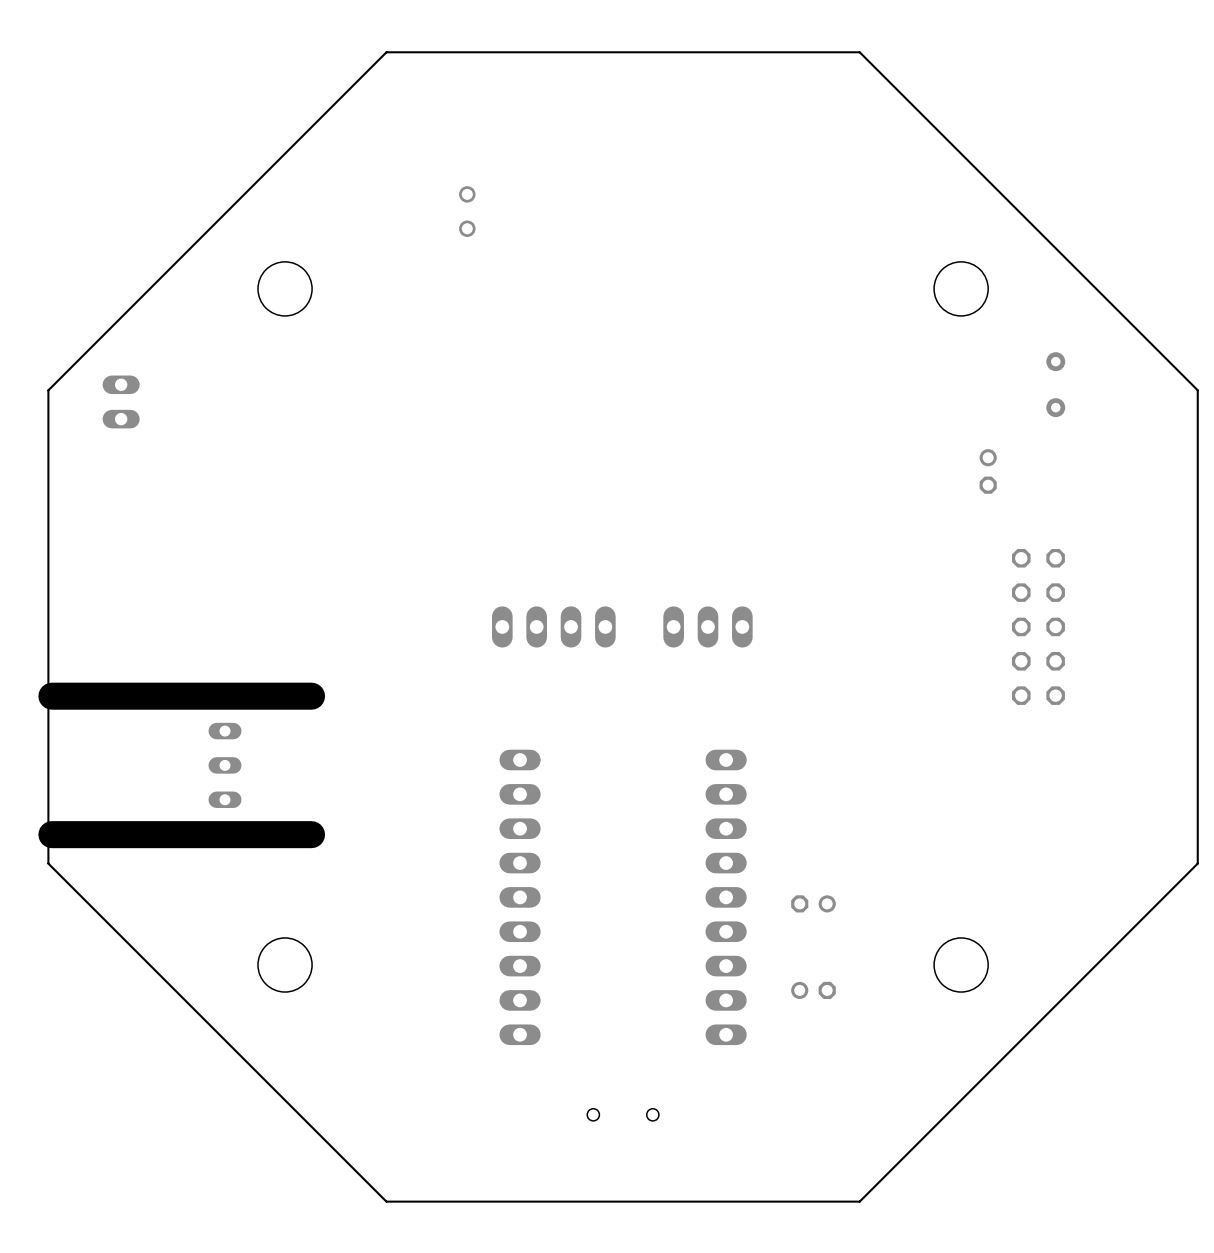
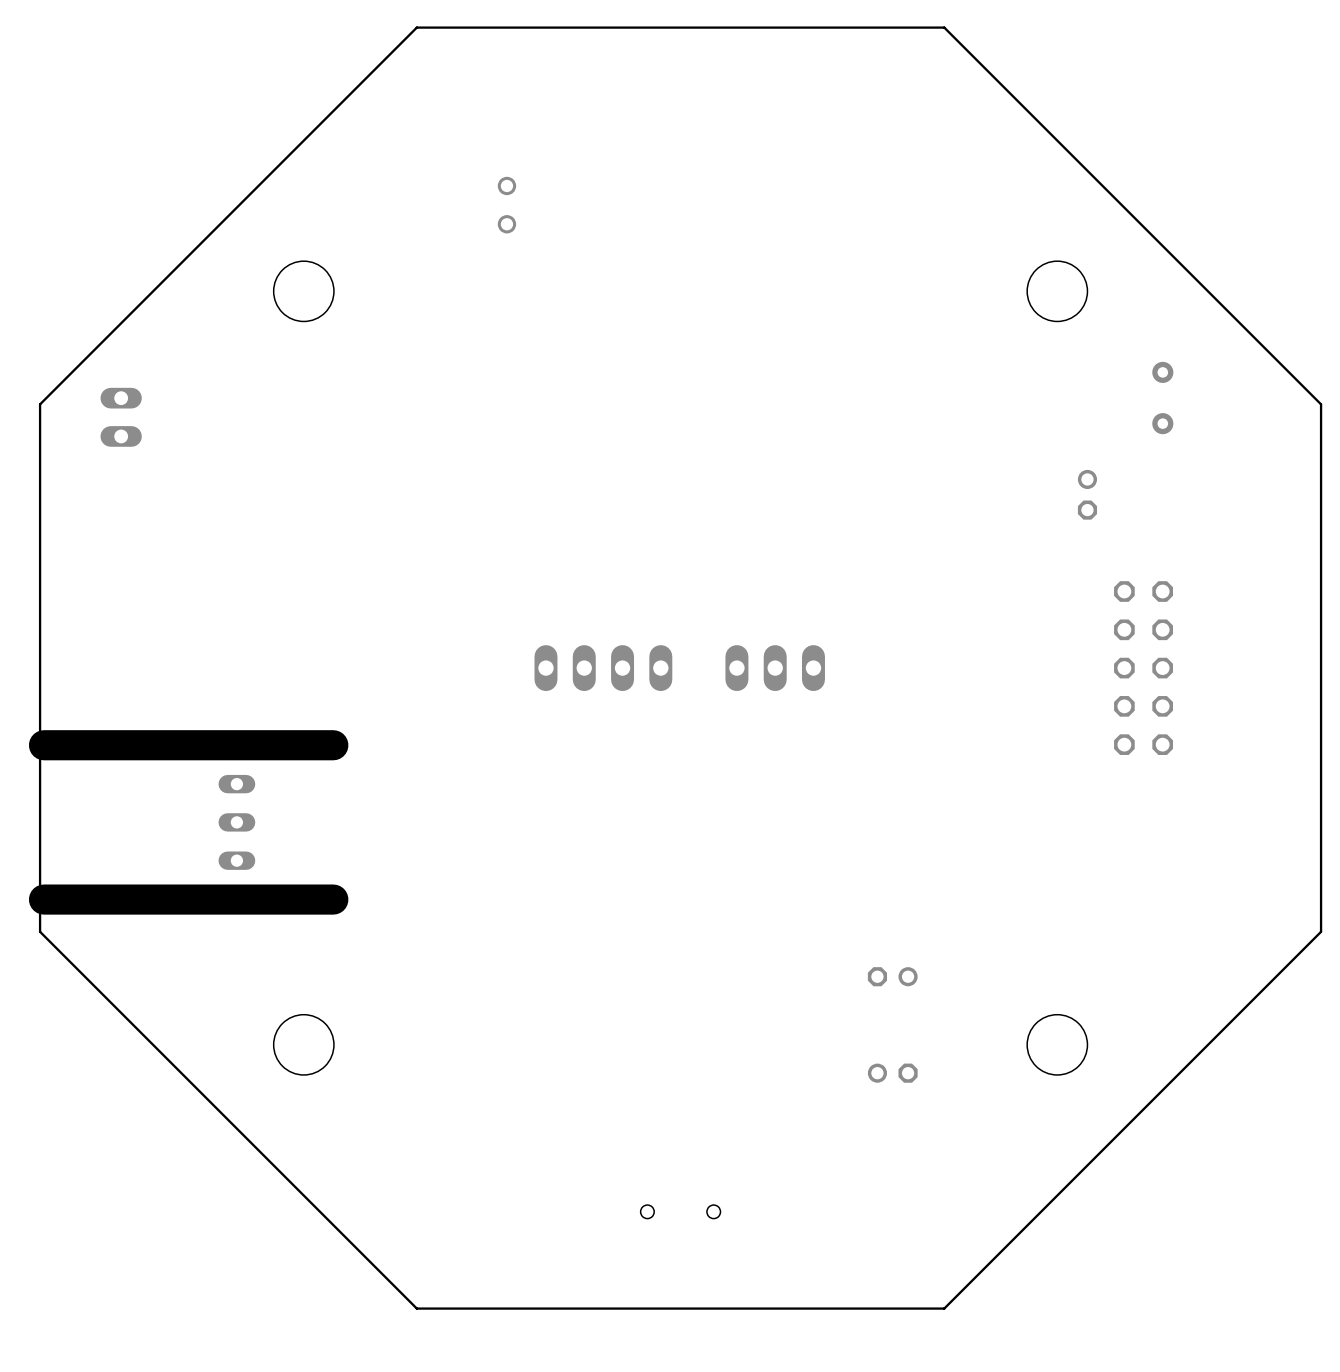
part: (520, 897) -> none
part: (726, 897) -> none

